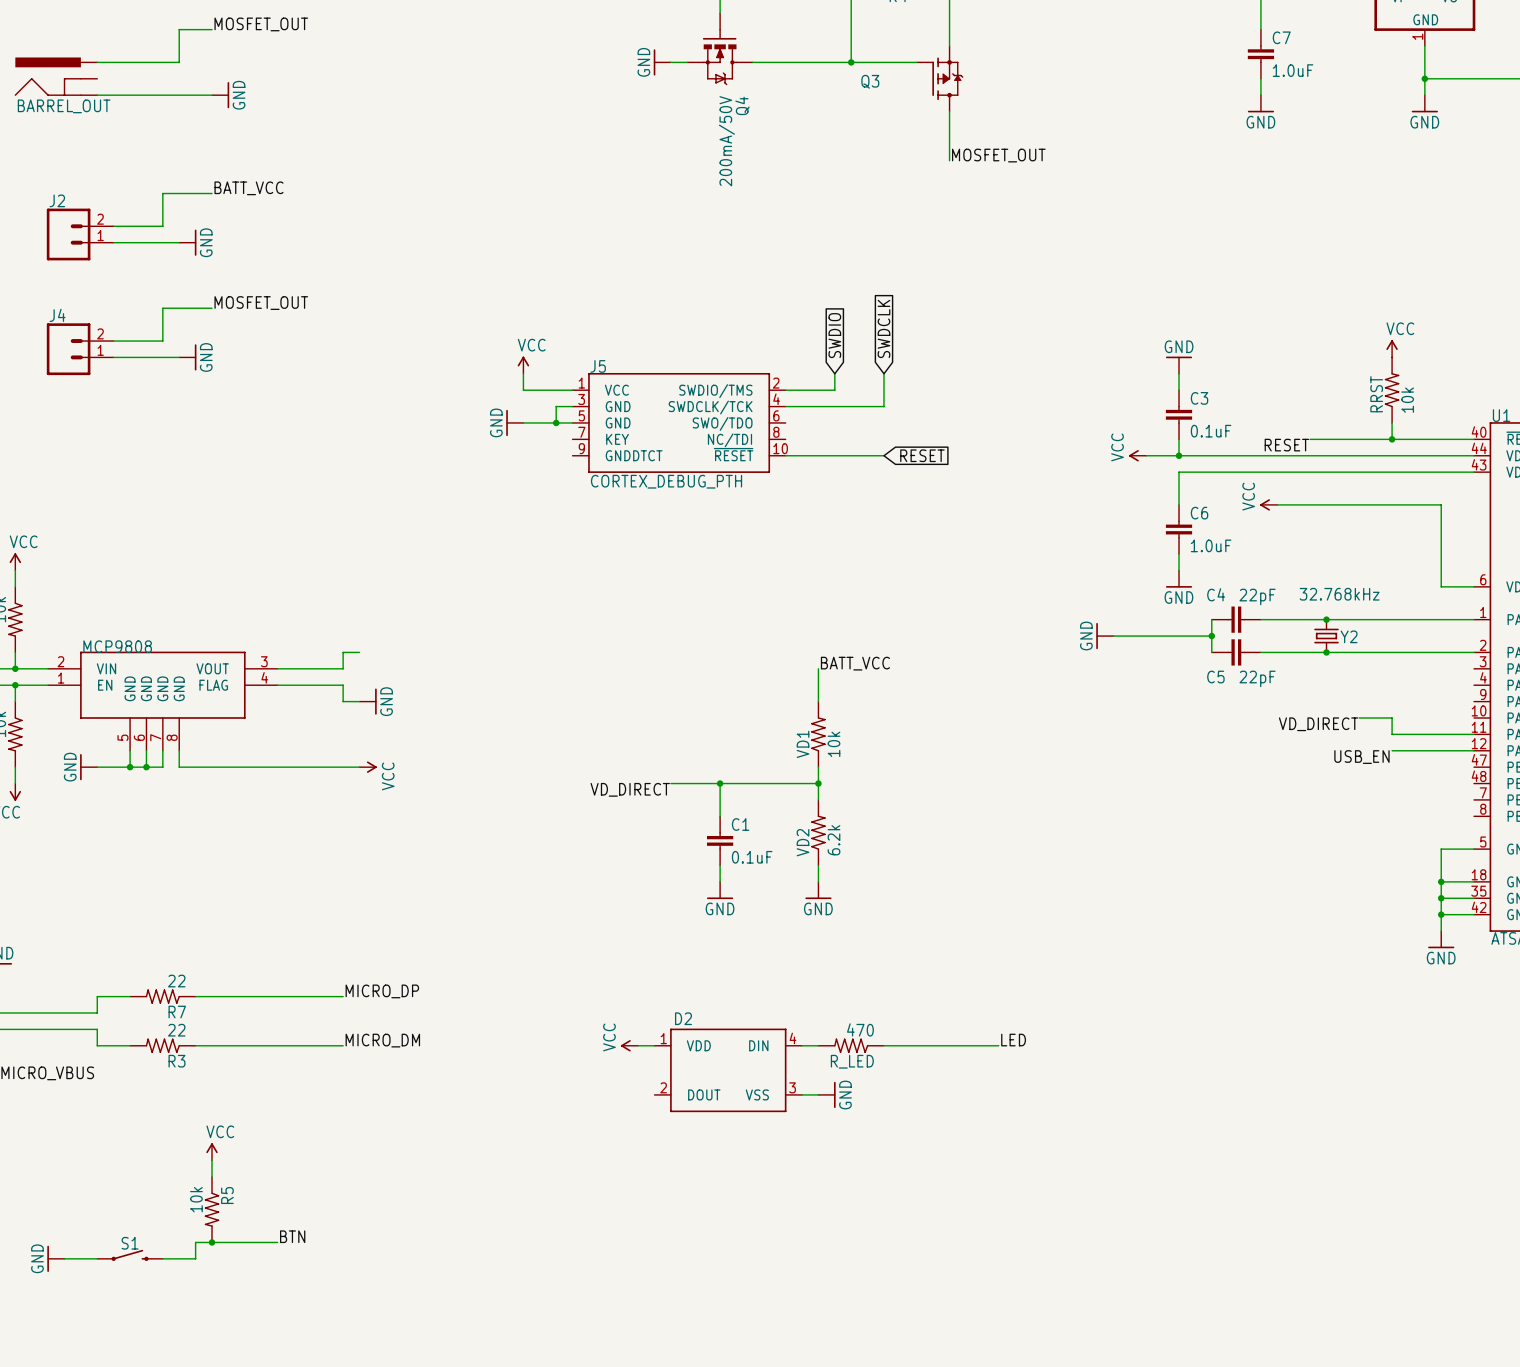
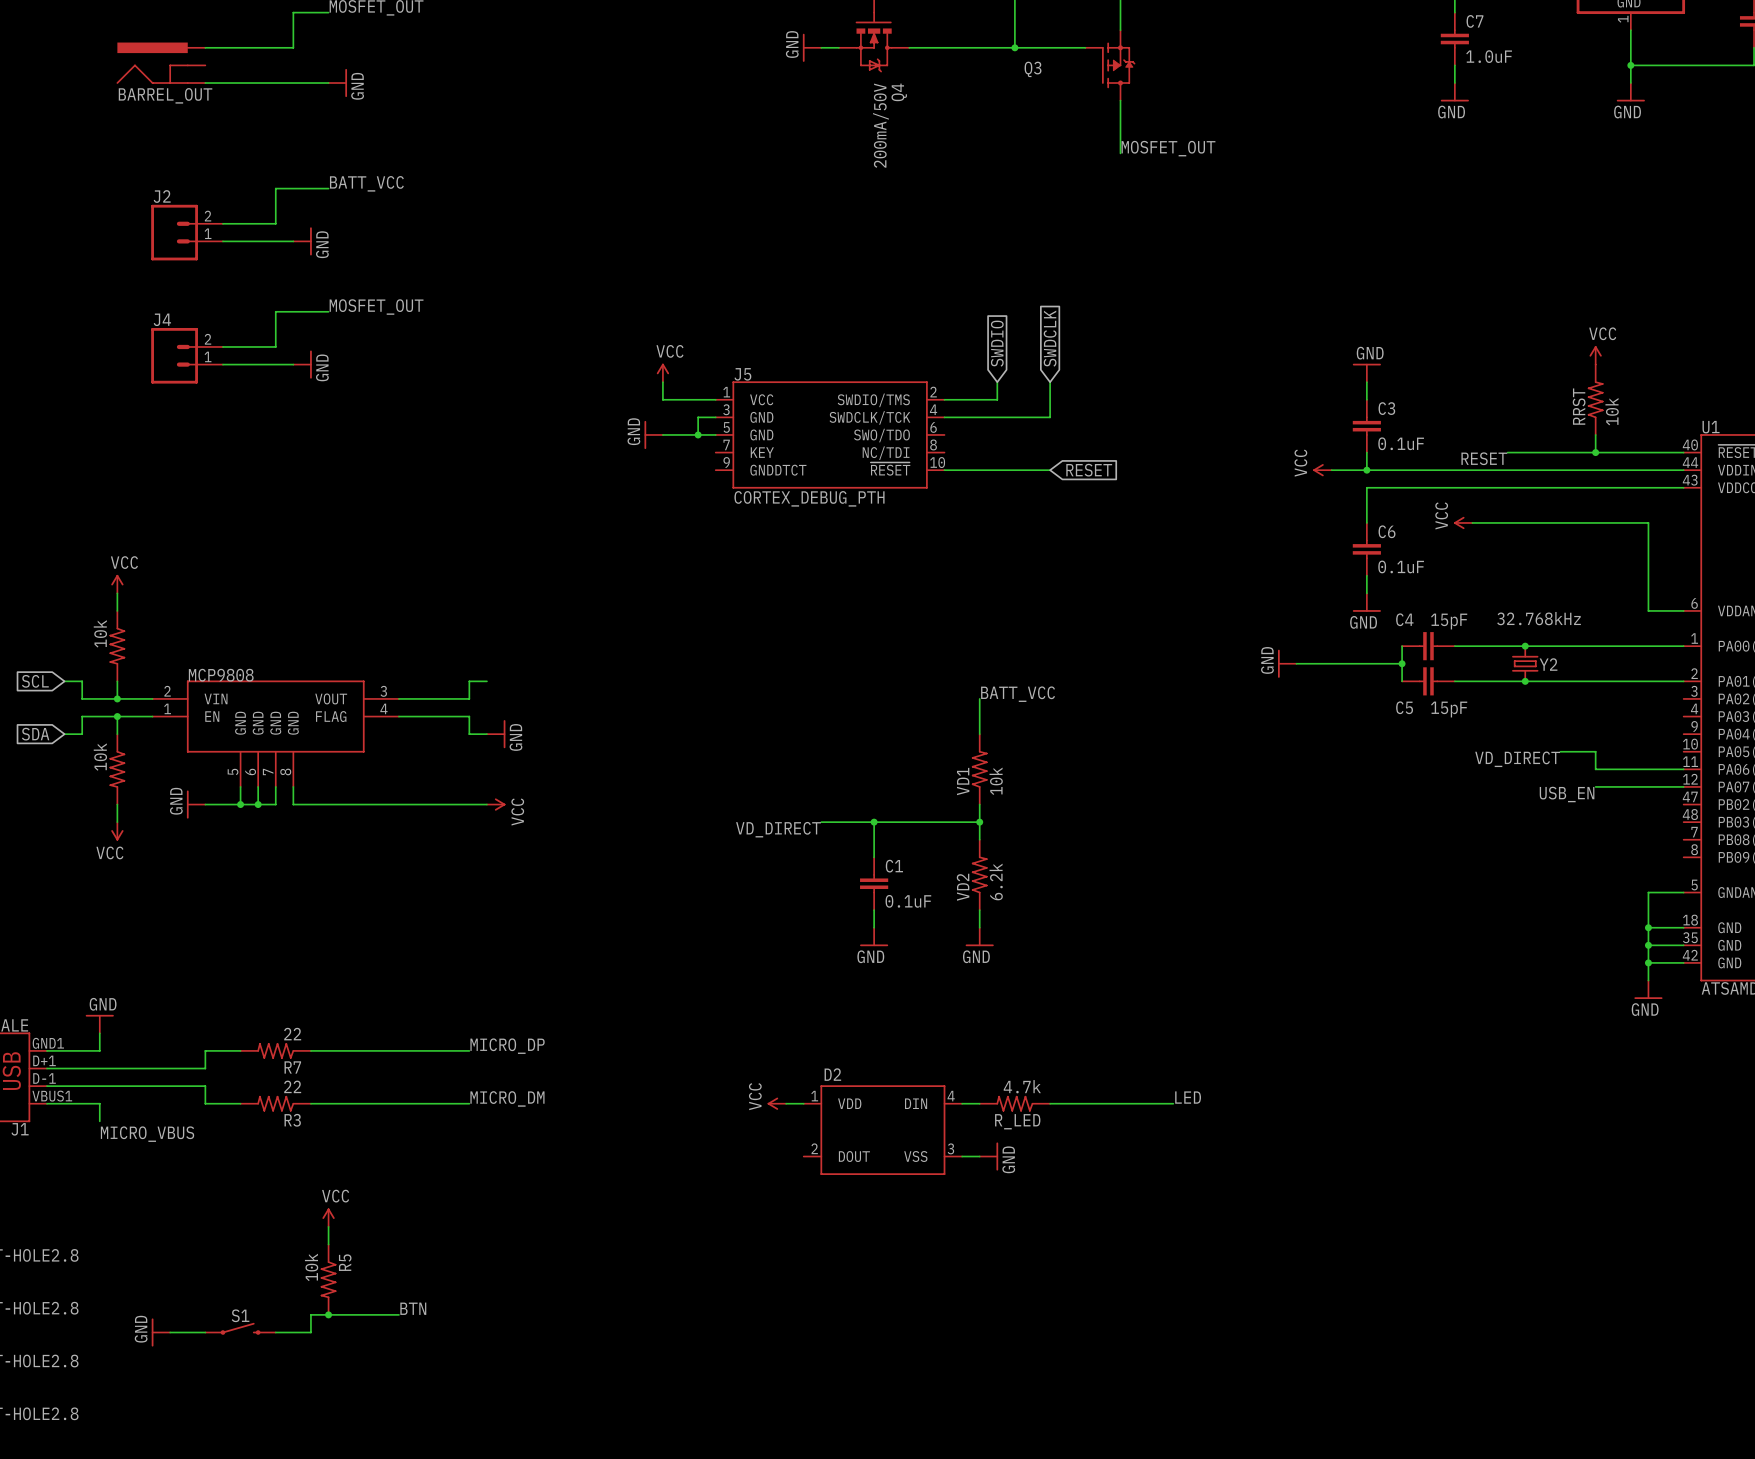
C6 value: 1.0uF (1211, 545) -> 0.1uF (1401, 566)
C4 value: 22pF (1257, 596) -> 15pF (1449, 621)
C5 value: 22pF (1257, 678) -> 15pF (1449, 709)
R_LED value: 470 (860, 1029) -> 4.7k (1022, 1086)

